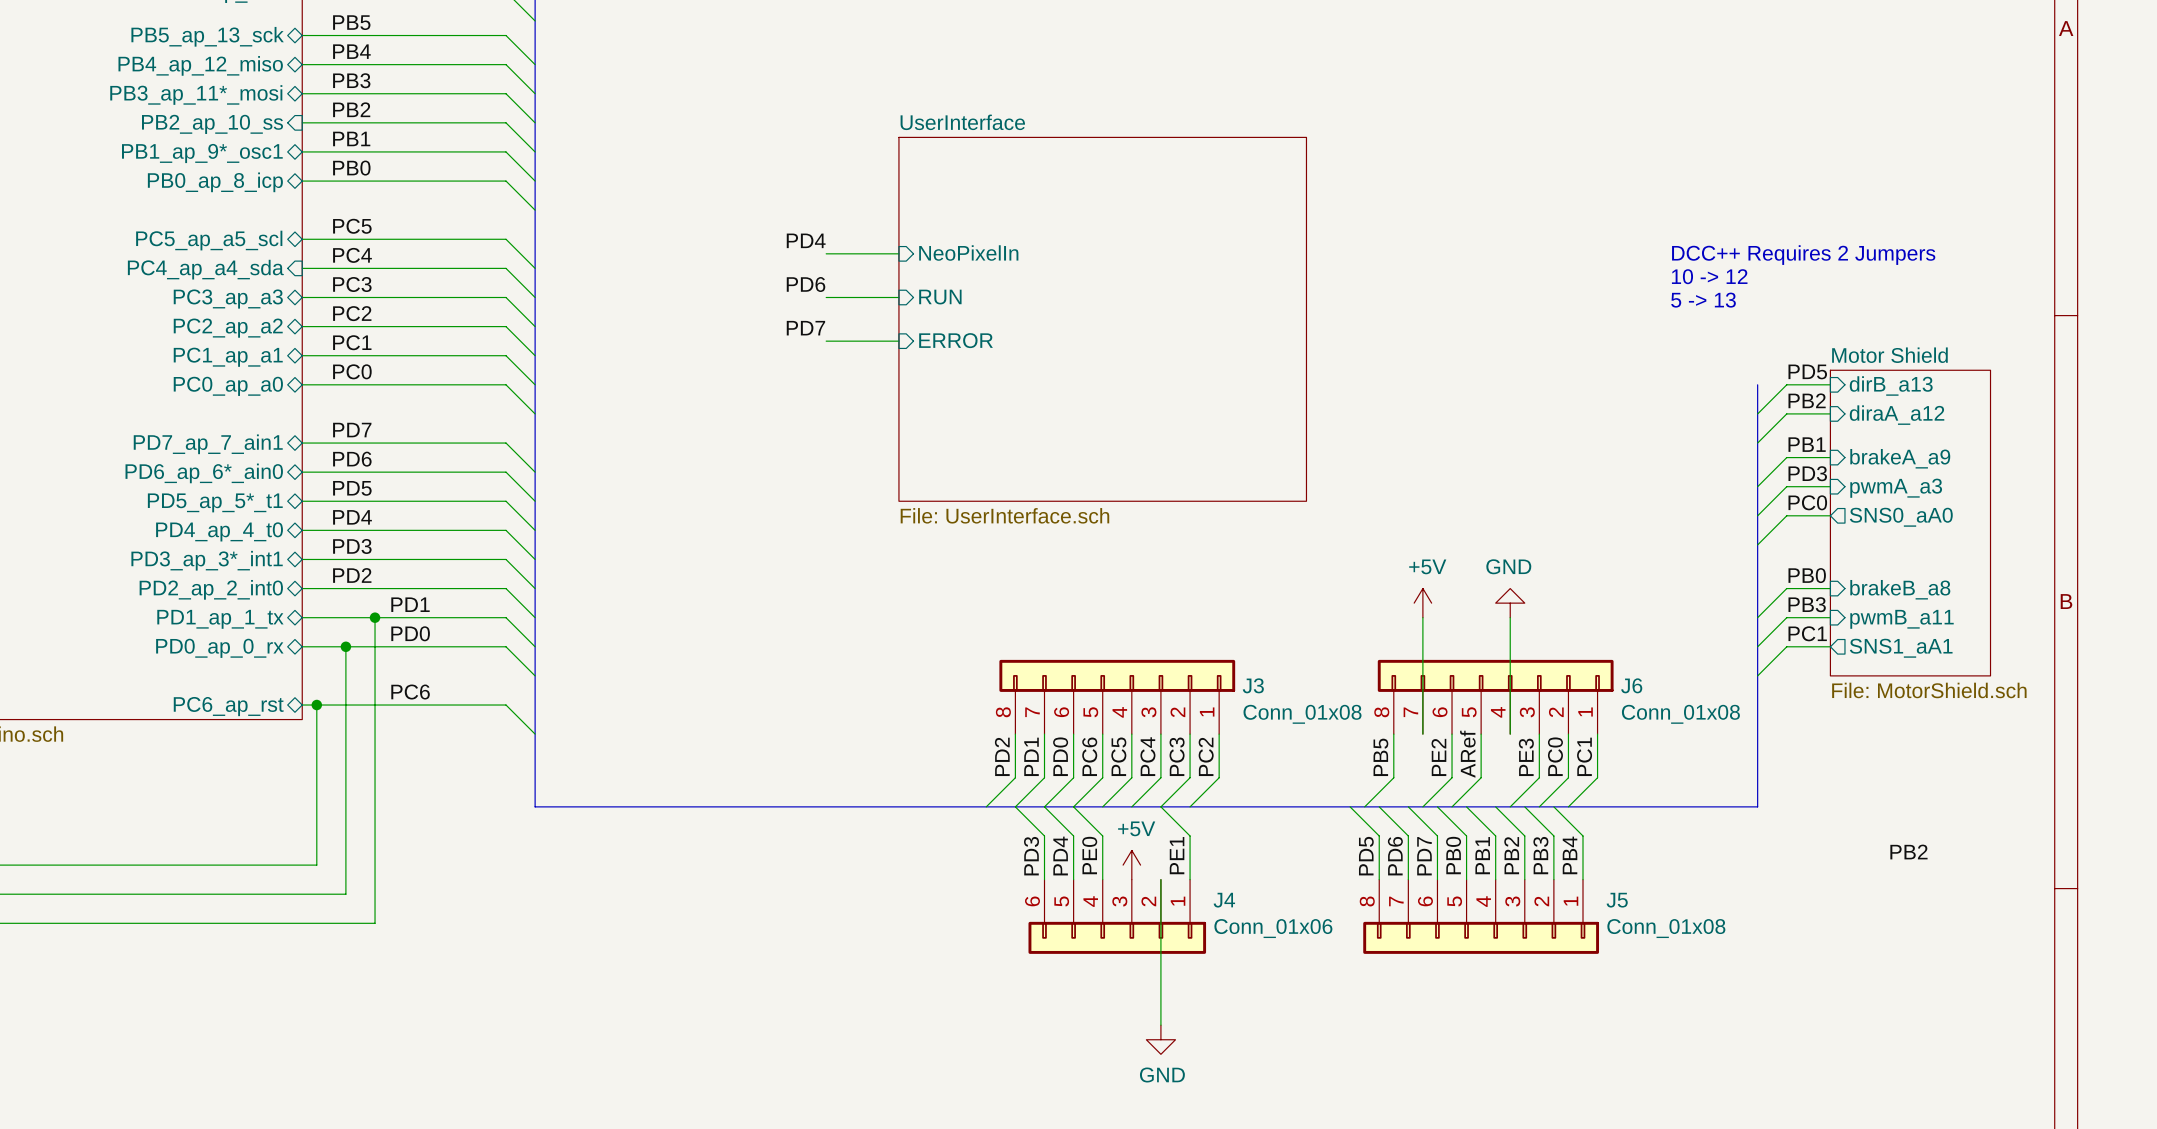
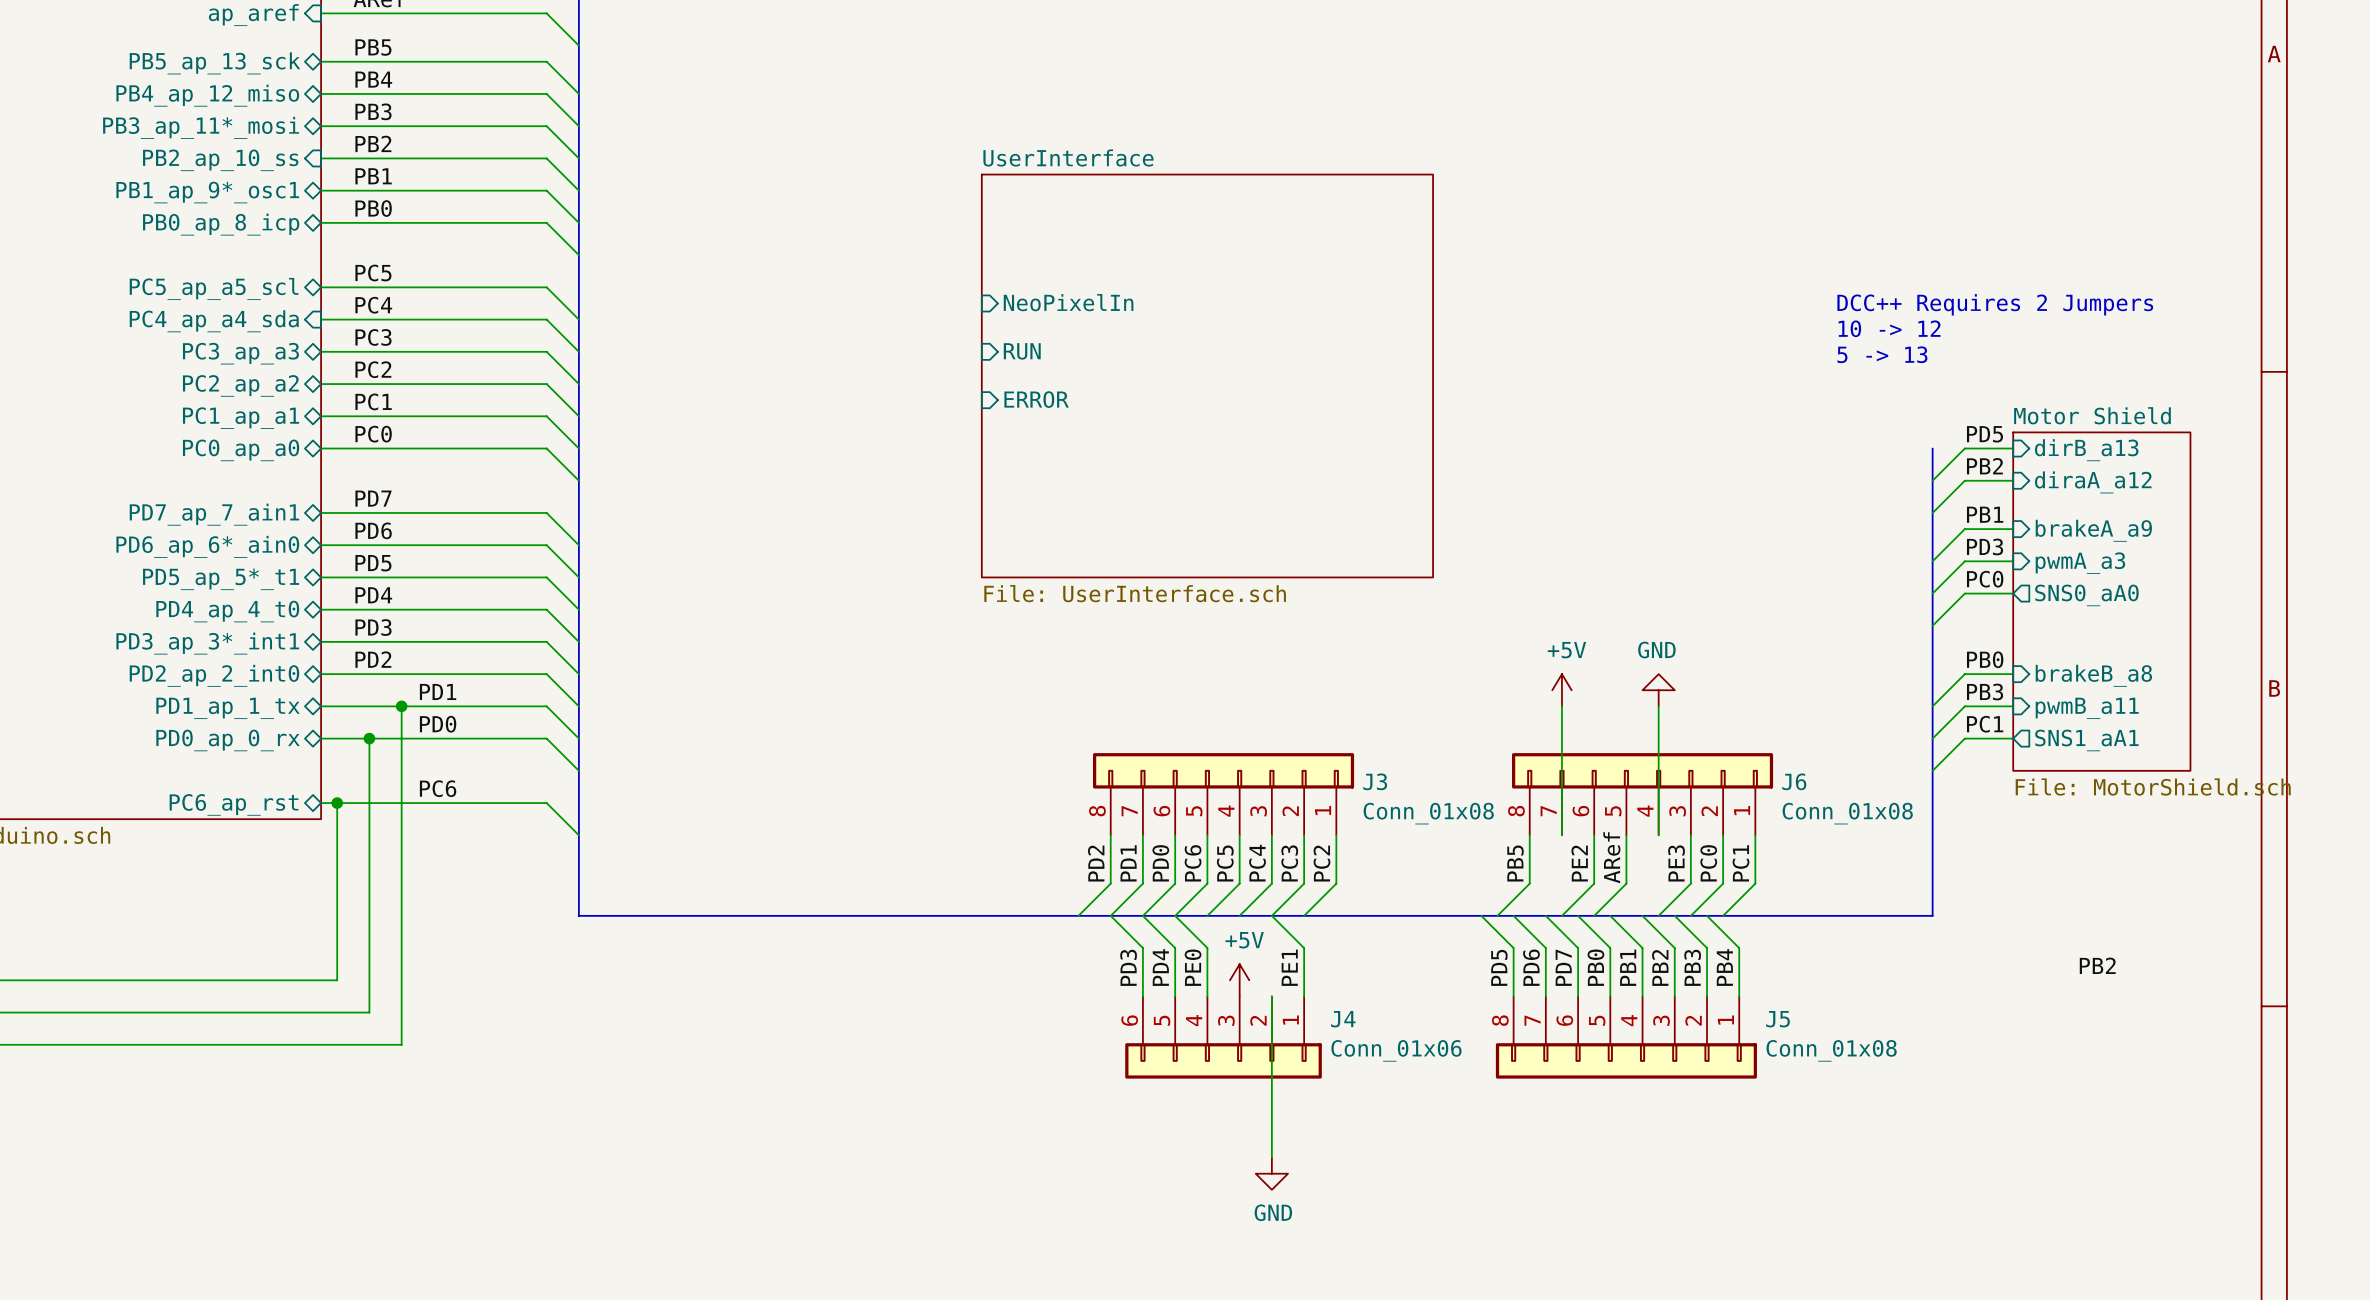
label: PD4 (806, 240) -> none
wire: (826, 253) (898, 253) -> none
label: PD6 (806, 284) -> none
wire: (826, 297) (898, 297) -> none
label: PD7 (805, 328) -> none
wire: (826, 341) (898, 341) -> none

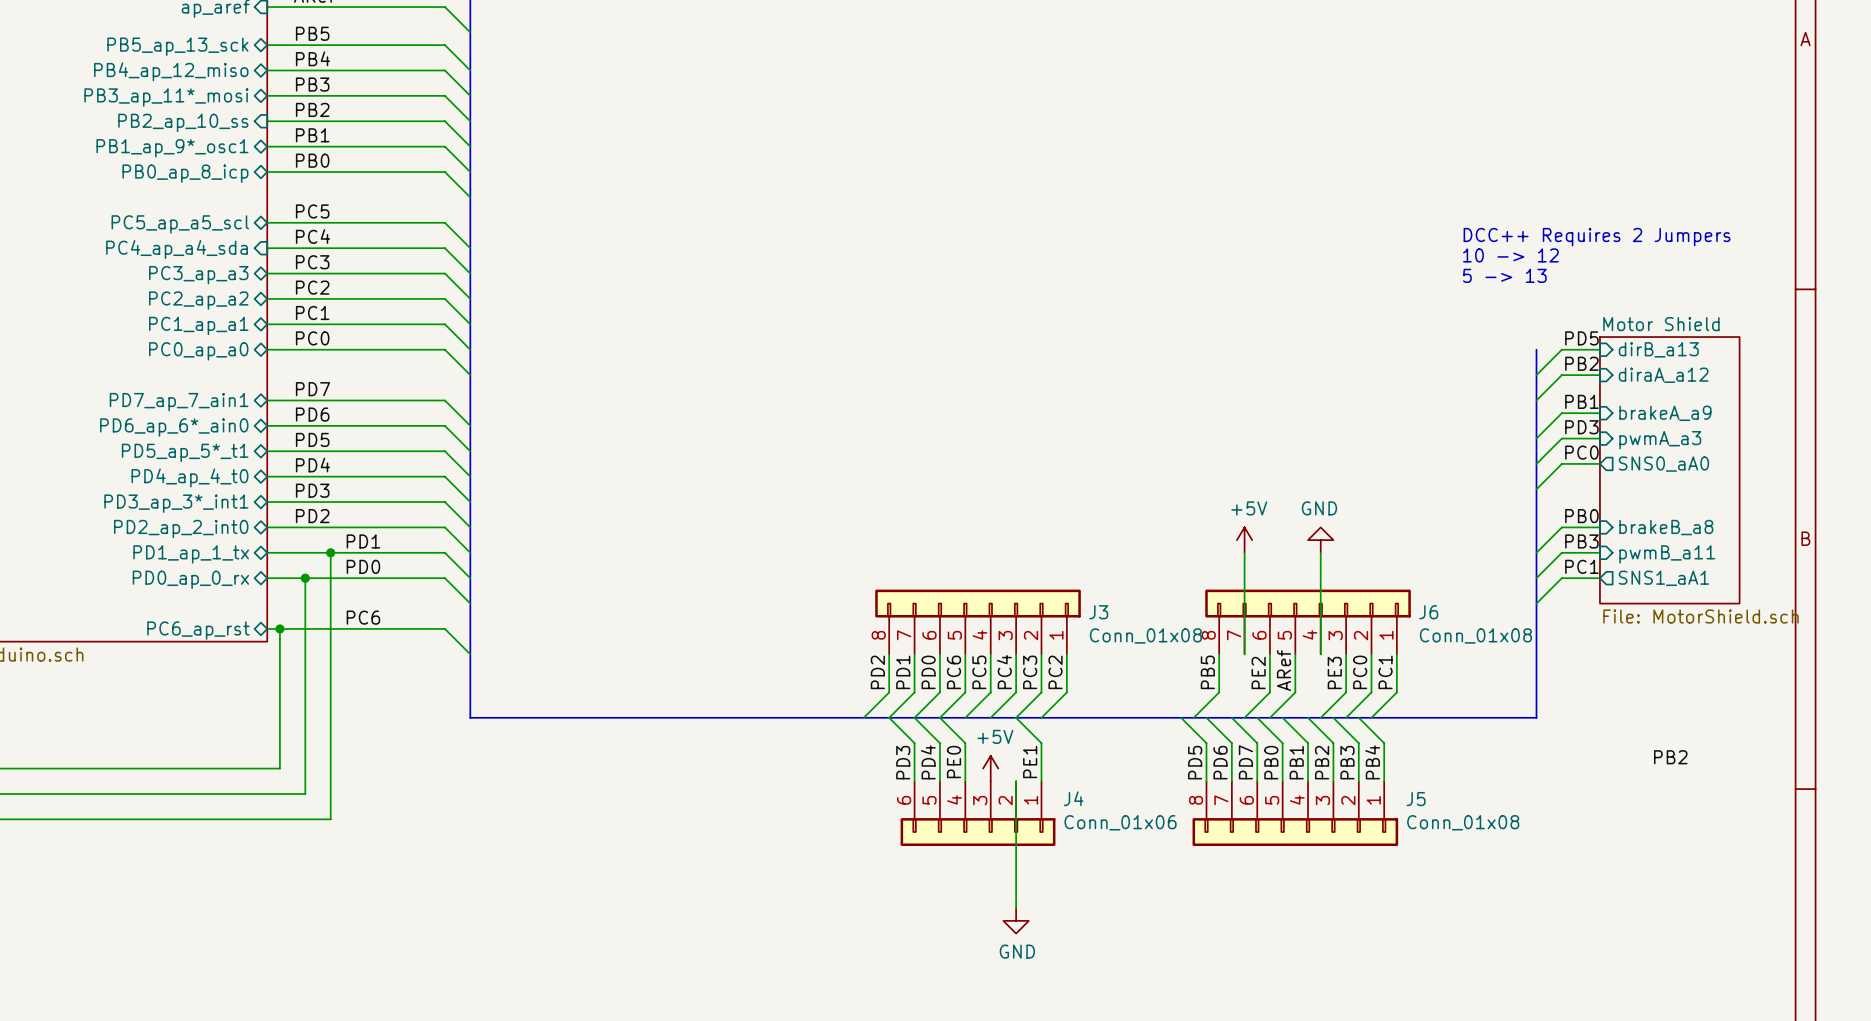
sheet pin: NeoPixelIn (1068, 302) -> none
sheet pin: RUN (1022, 351) -> none
sheet UserInterface: File: UserInterface.sch (1207, 376) -> none
sheet pin: ERROR (1036, 399) -> none

